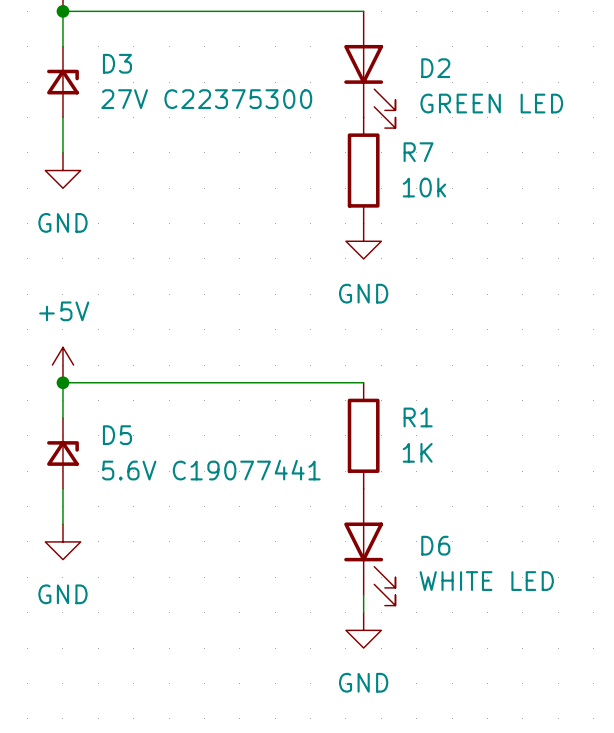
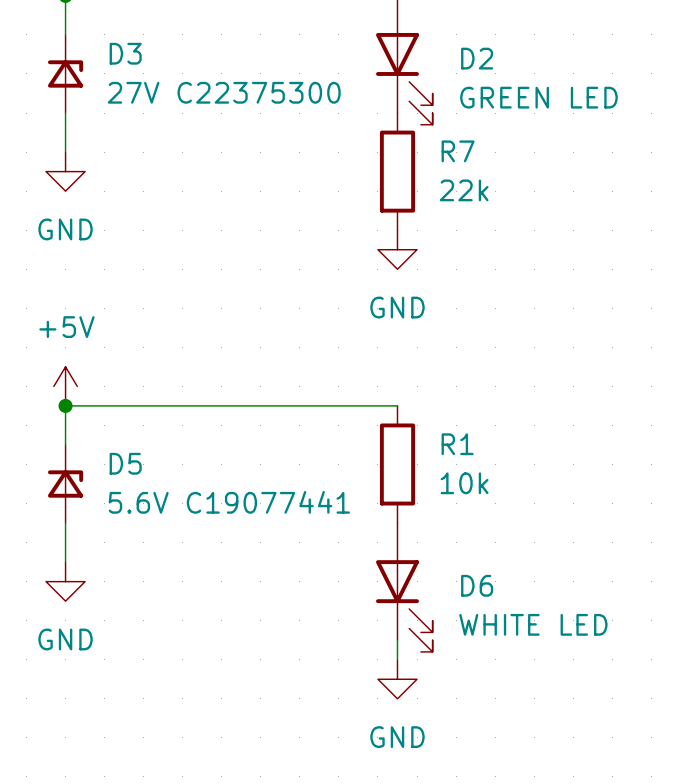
R7 value: 10k (424, 187) -> 22k (464, 190)
R1 value: 1K (417, 452) -> 10k (464, 483)

